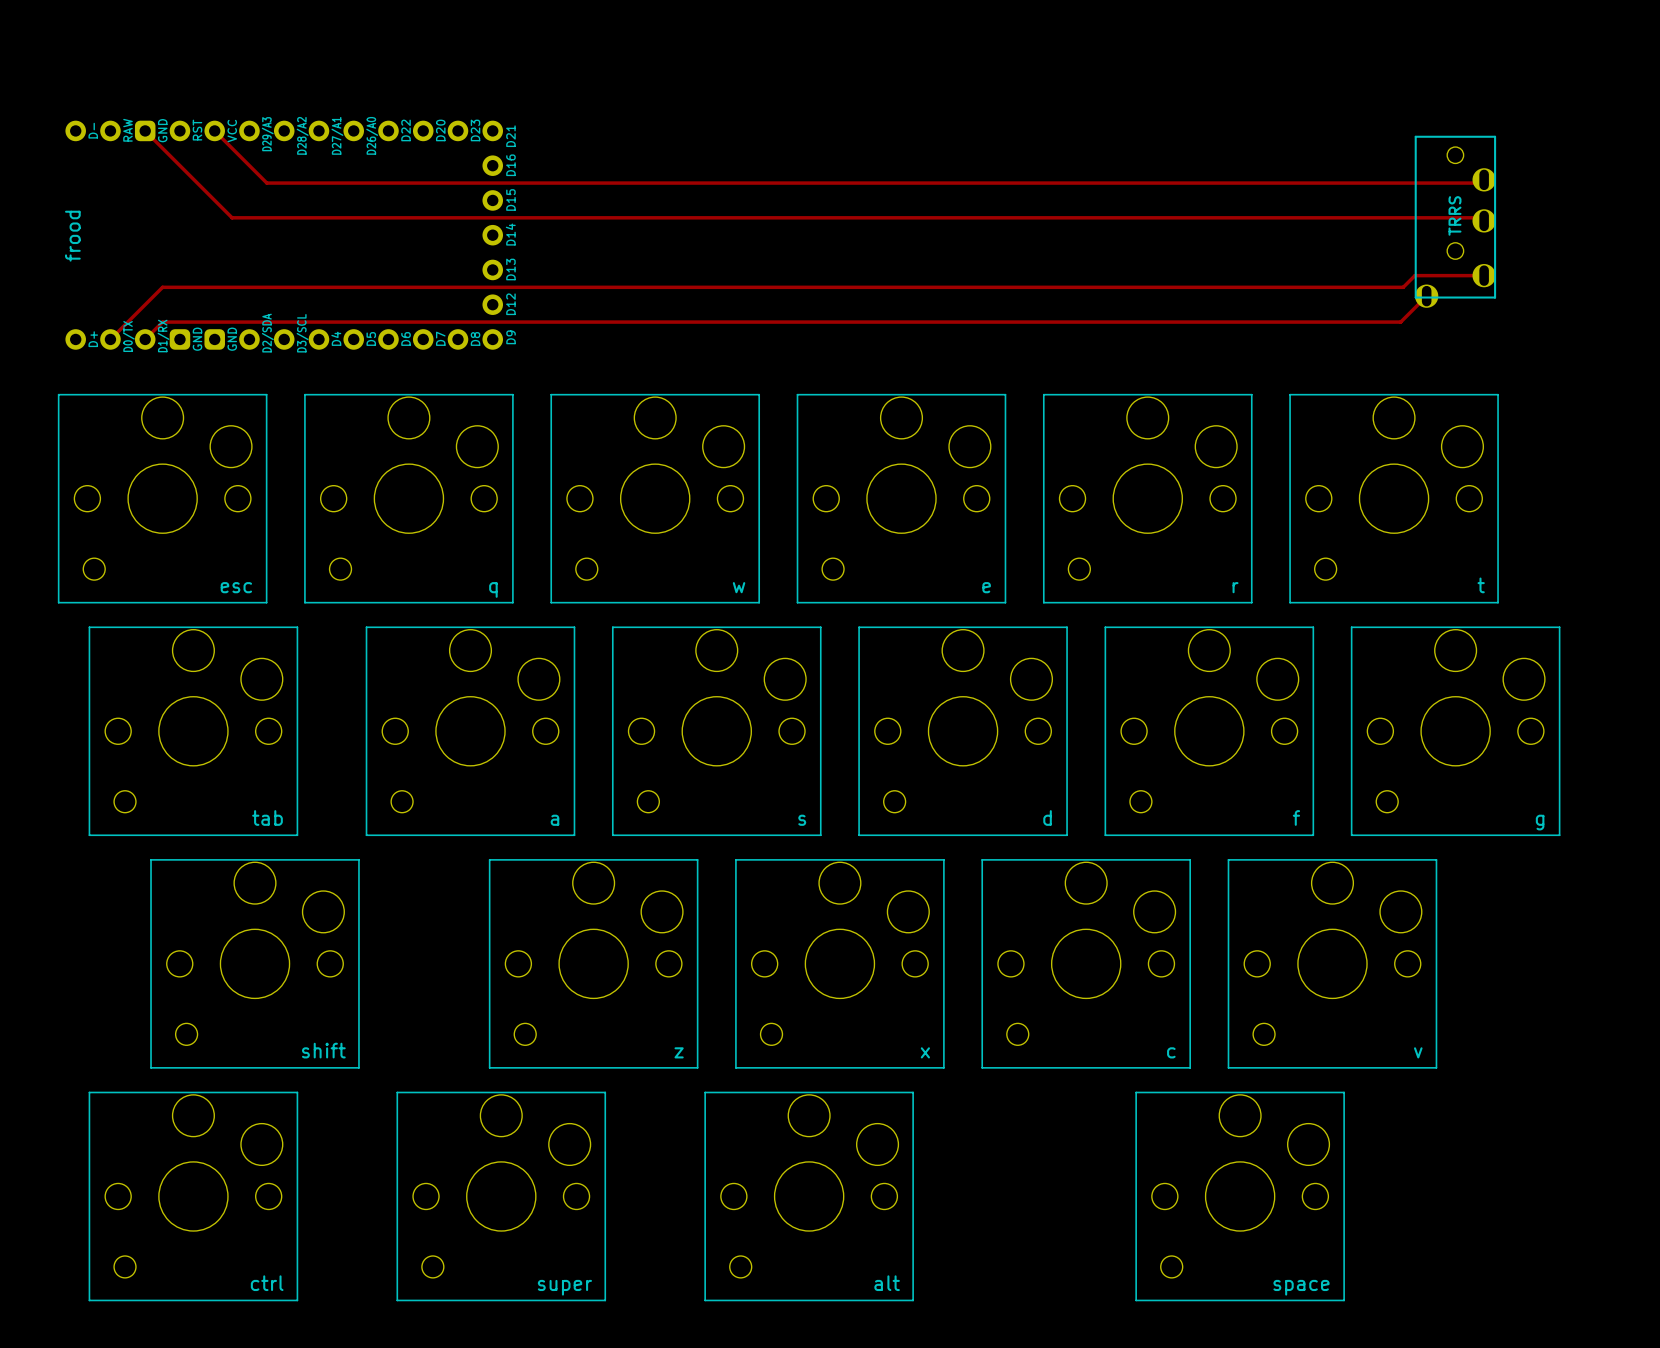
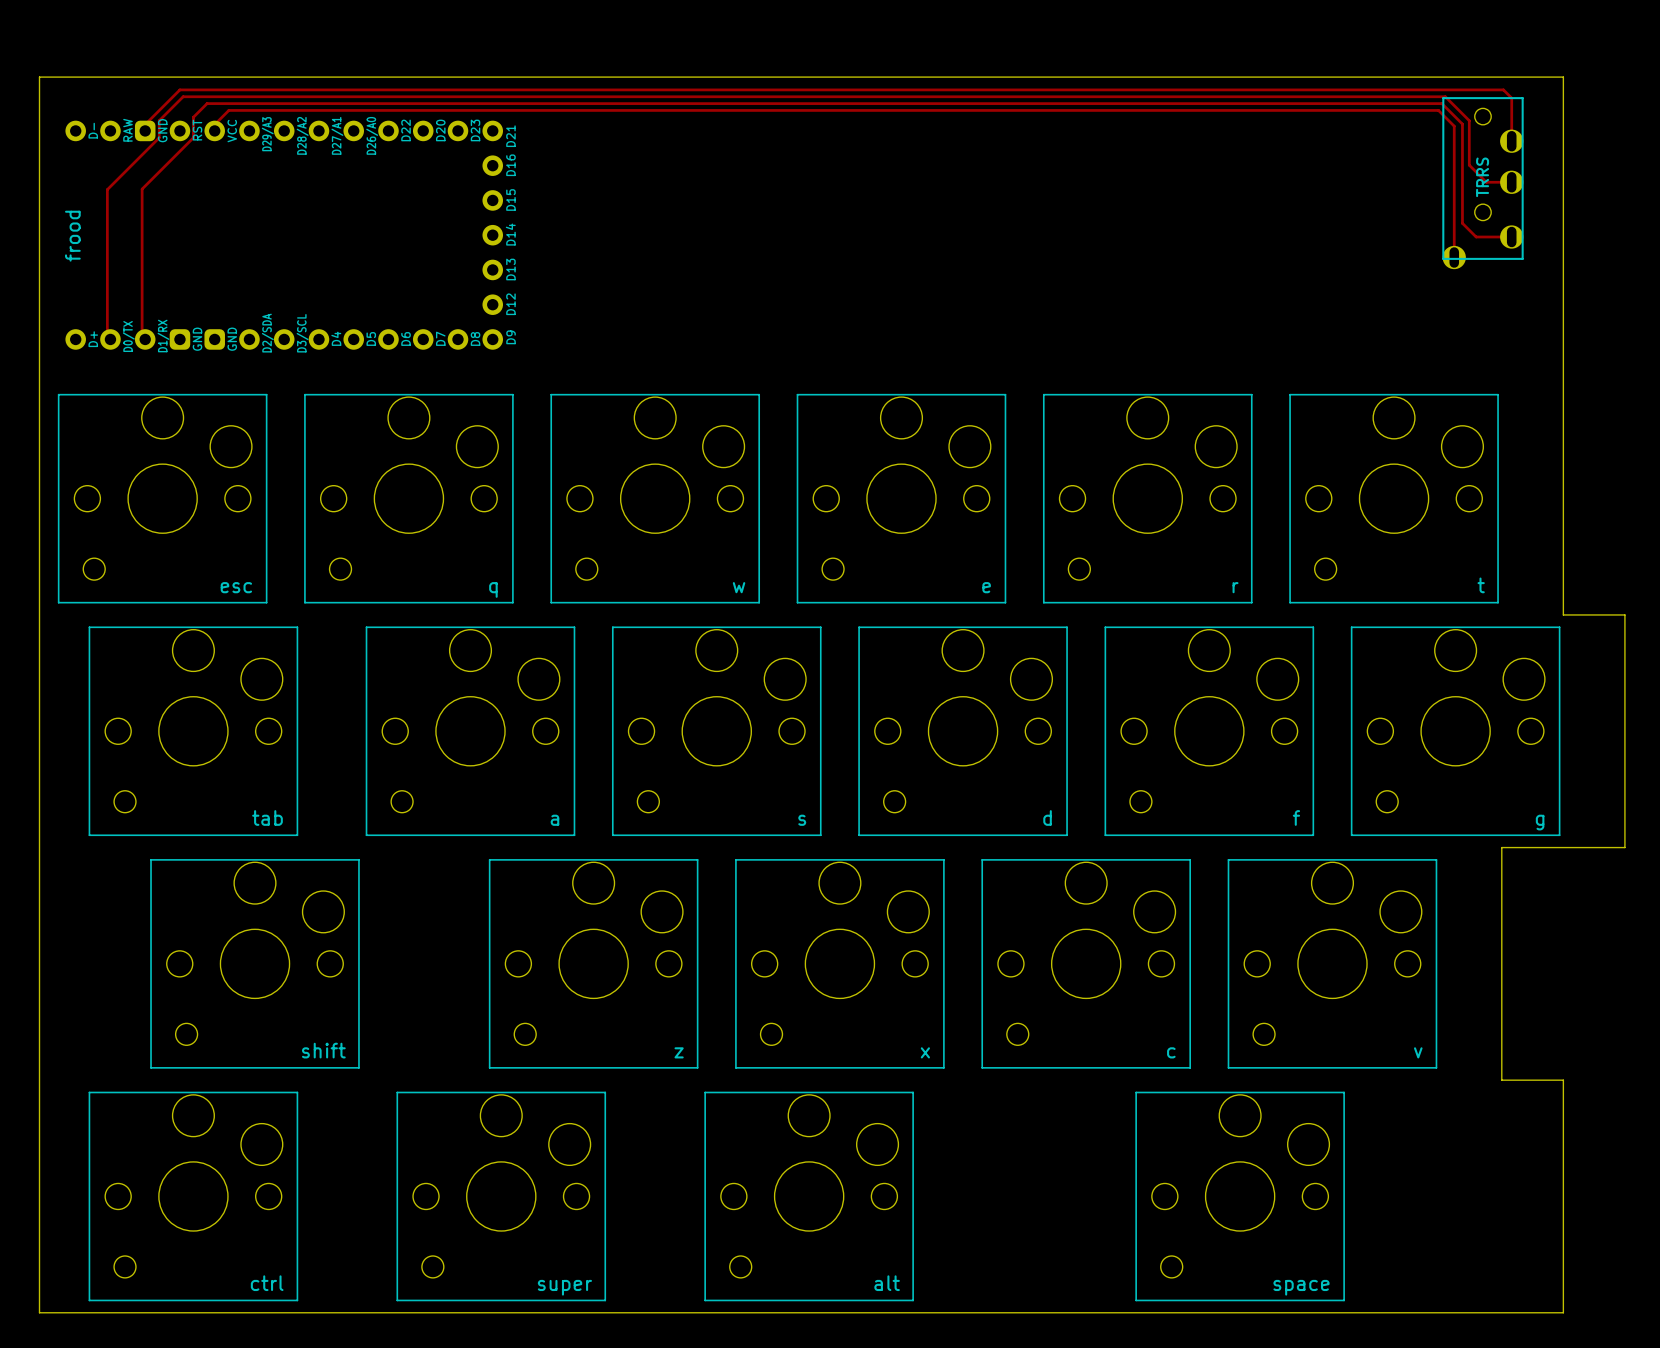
board edge: none -> (39, 77) (1563, 77) (1563, 614) (1624, 614) (1624, 847) (1501, 847) (1501, 1080) (1563, 1080) (1563, 1312) (39, 1312) (39, 77)
track: none -> (142, 127) (179, 89) (1503, 89) (1511, 98) (1511, 141)
track: none -> (211, 127) (228, 110) (1438, 110) (1454, 126) (1454, 257)
track: (145, 130) (232, 217) (1481, 217) (1484, 220) -> none
track: (214, 130) (266, 183) (1480, 183) (1484, 179) -> none
track: none -> (1511, 182) (1486, 182) (1469, 165) (1469, 120) (1445, 96) (183, 96) (159, 120) (159, 137) (107, 189) (107, 336)
part: none -> (1482, 183)
part: (1455, 221) -> none
track: none -> (1511, 237) (1476, 237) (1462, 223) (1462, 124) (1441, 103) (207, 103) (193, 117) (193, 137) (142, 189) (142, 336)
track: (1484, 275) (1414, 275) (1403, 287) (162, 287) (110, 339) -> none
track: (1426, 296) (1400, 322) (162, 322) (145, 339) -> none

